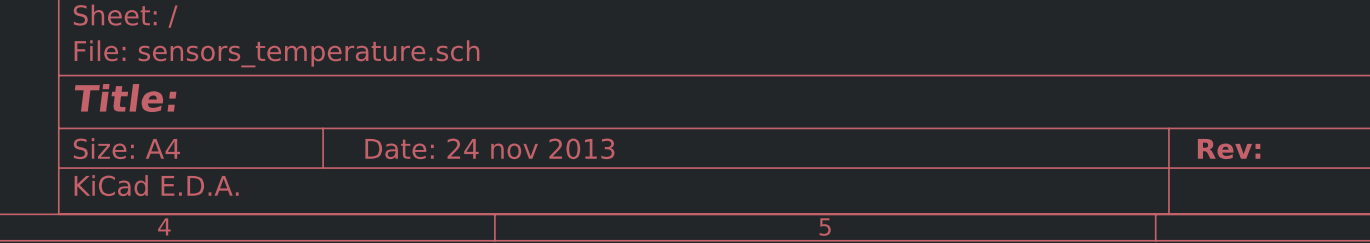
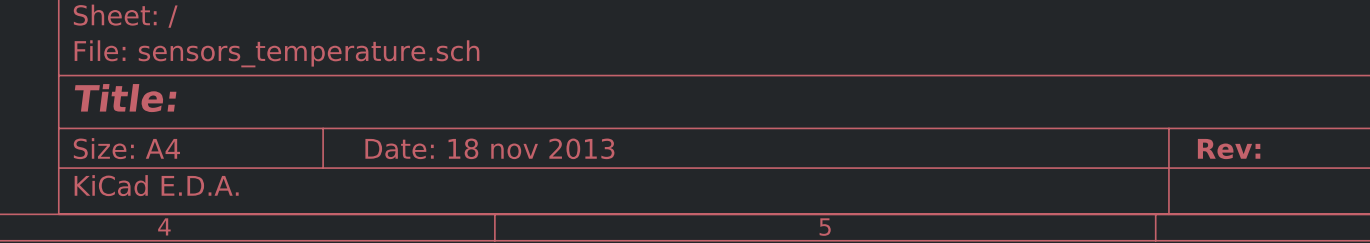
title block: Date: 24 nov 2013 (489, 148) -> Date: 18 nov 2013 (489, 148)

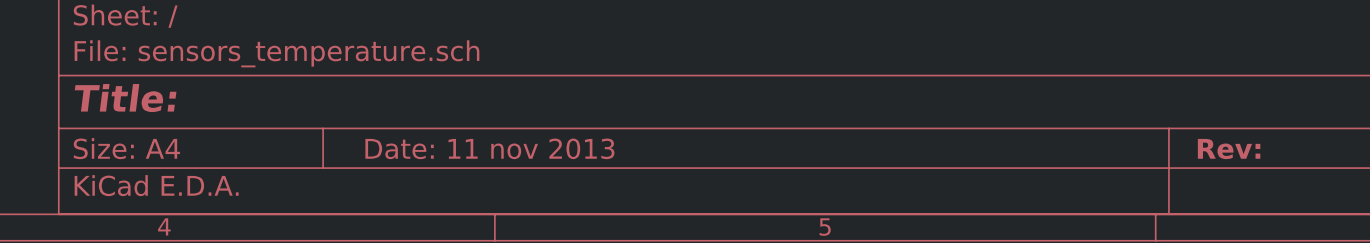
title block: Date: 18 nov 2013 (489, 148) -> Date: 11 nov 2013 (489, 148)

